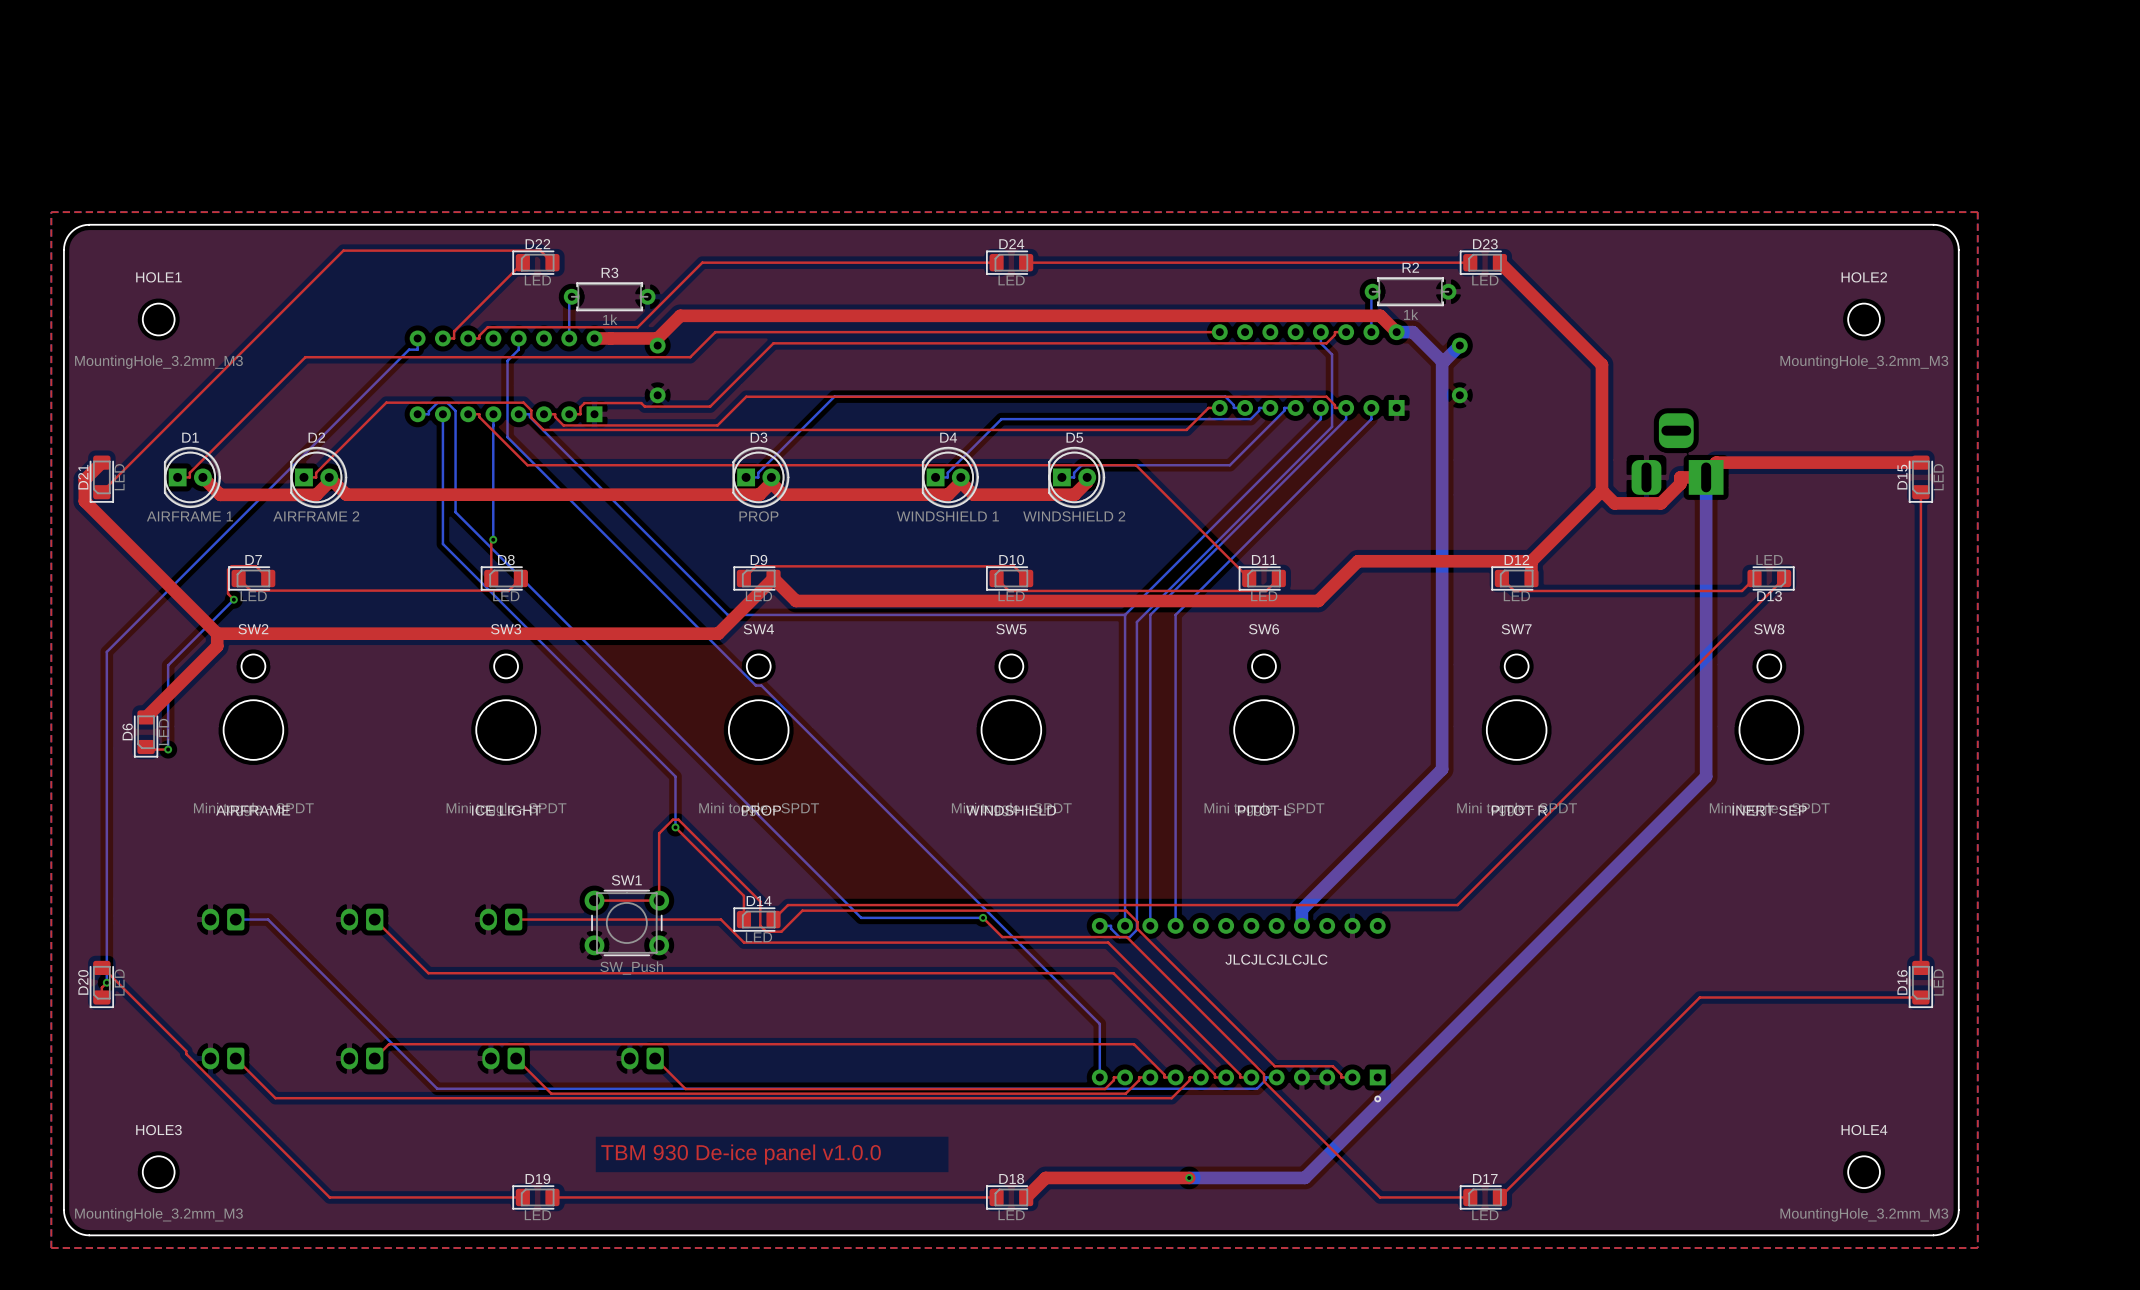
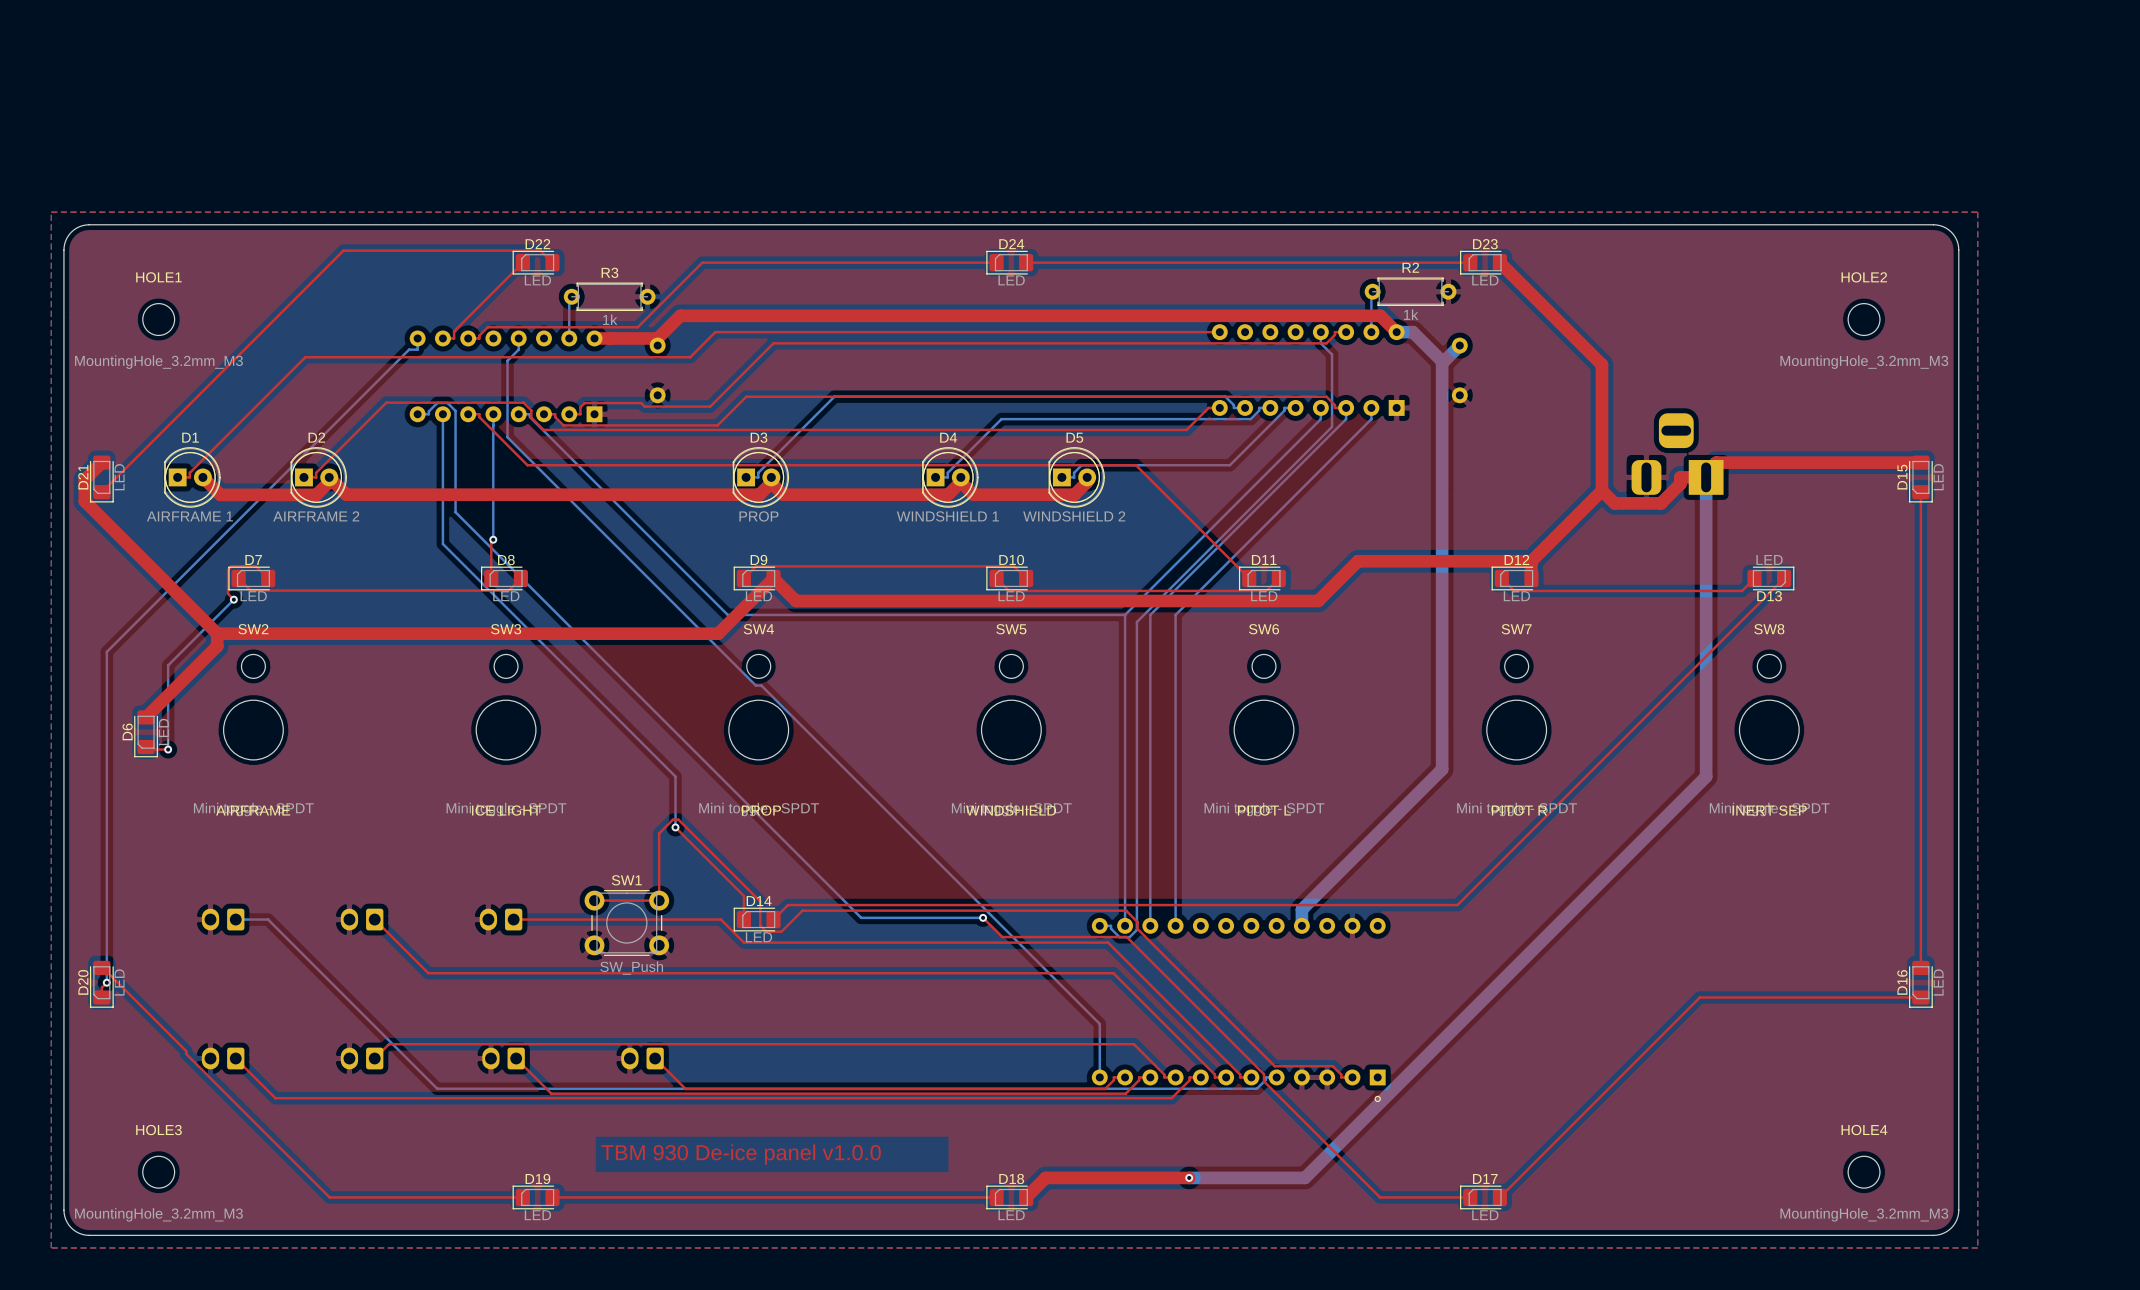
text: JLCJLCJLCJLC (1276, 959) -> none

